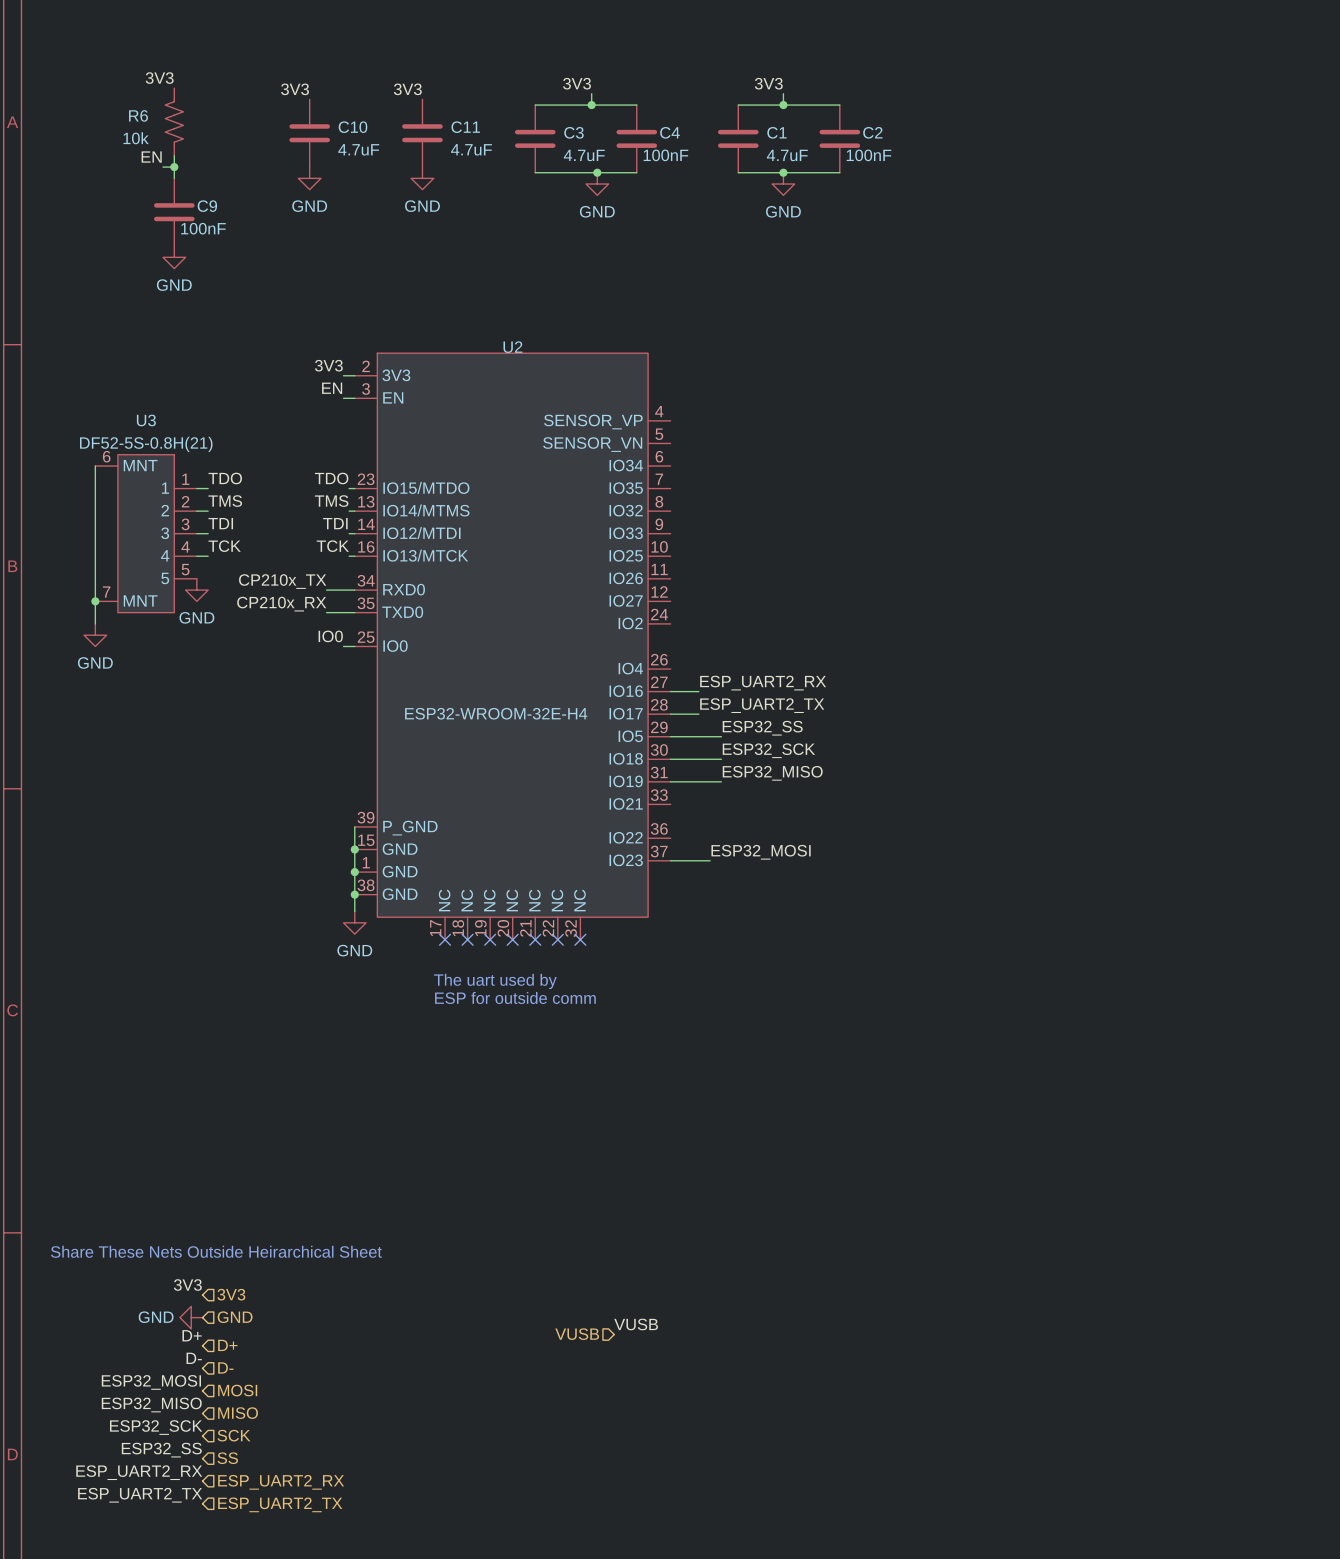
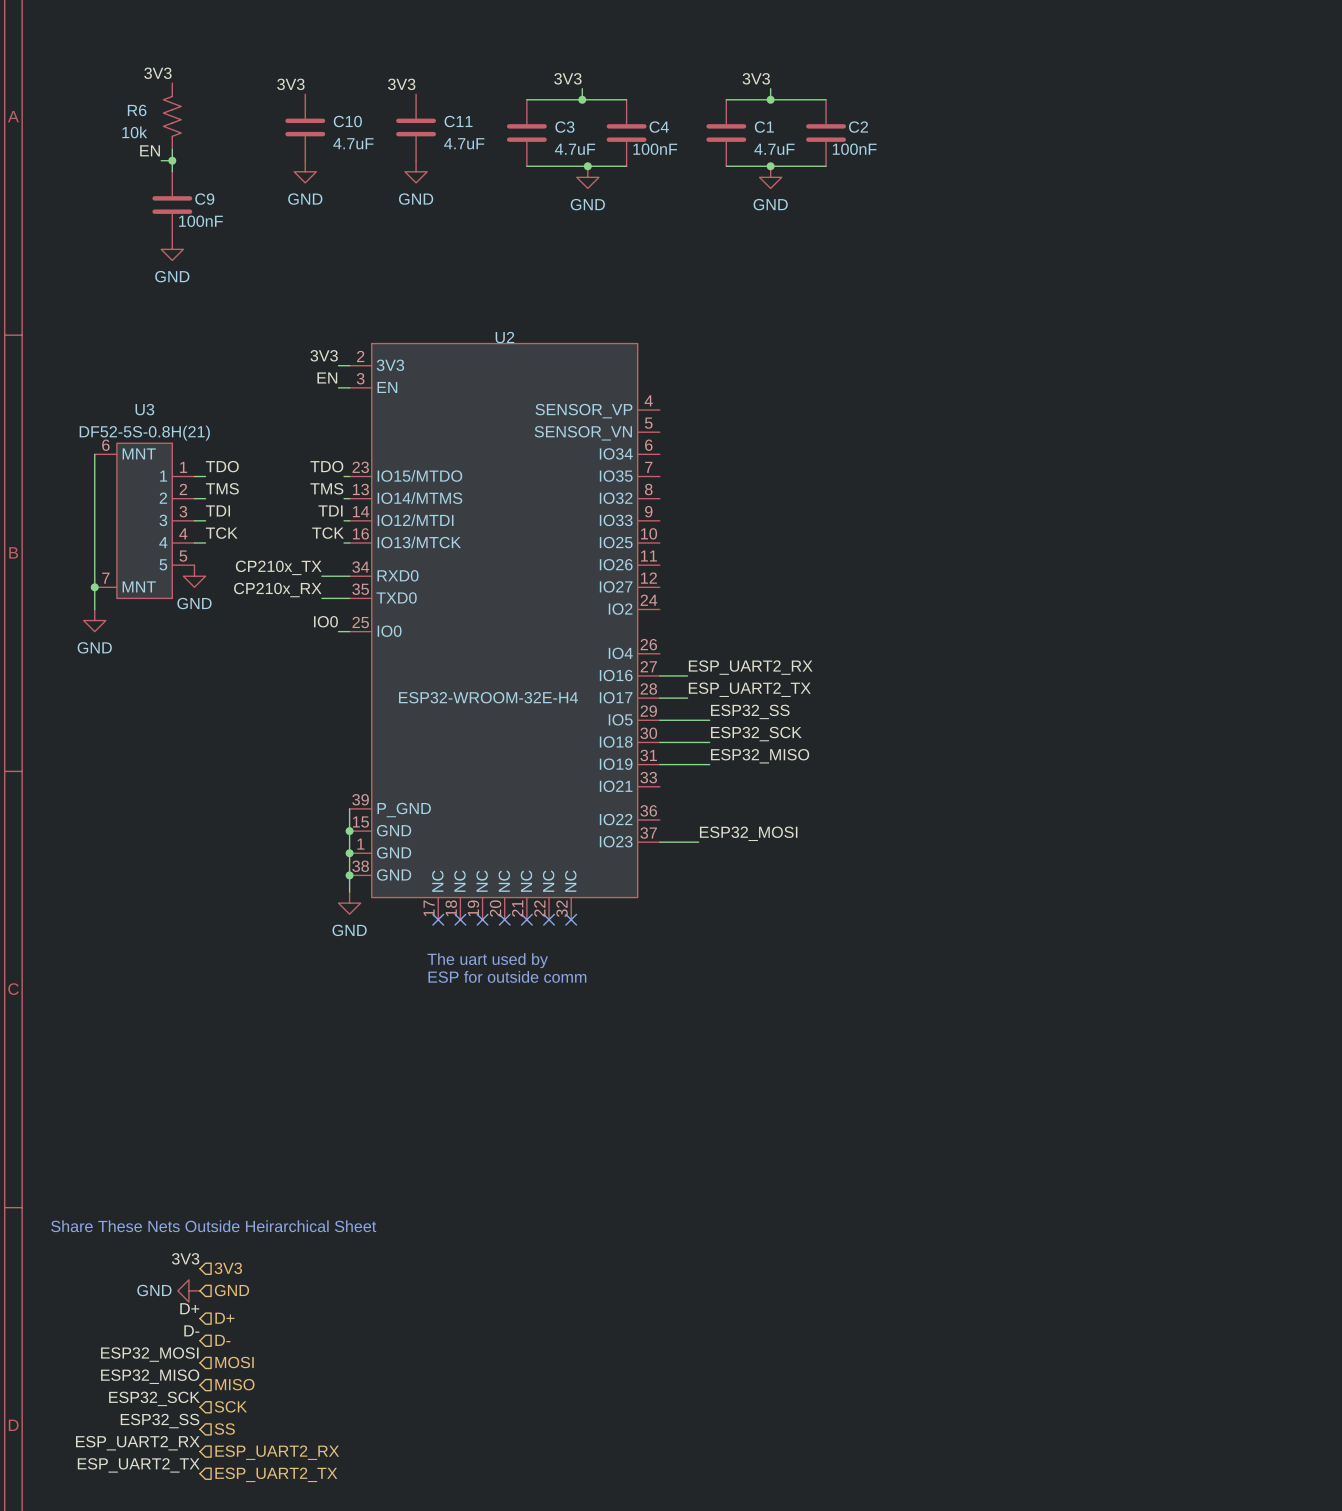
label: VUSB (636, 1324) -> none
hierarchical label: VUSB (577, 1334) -> none

